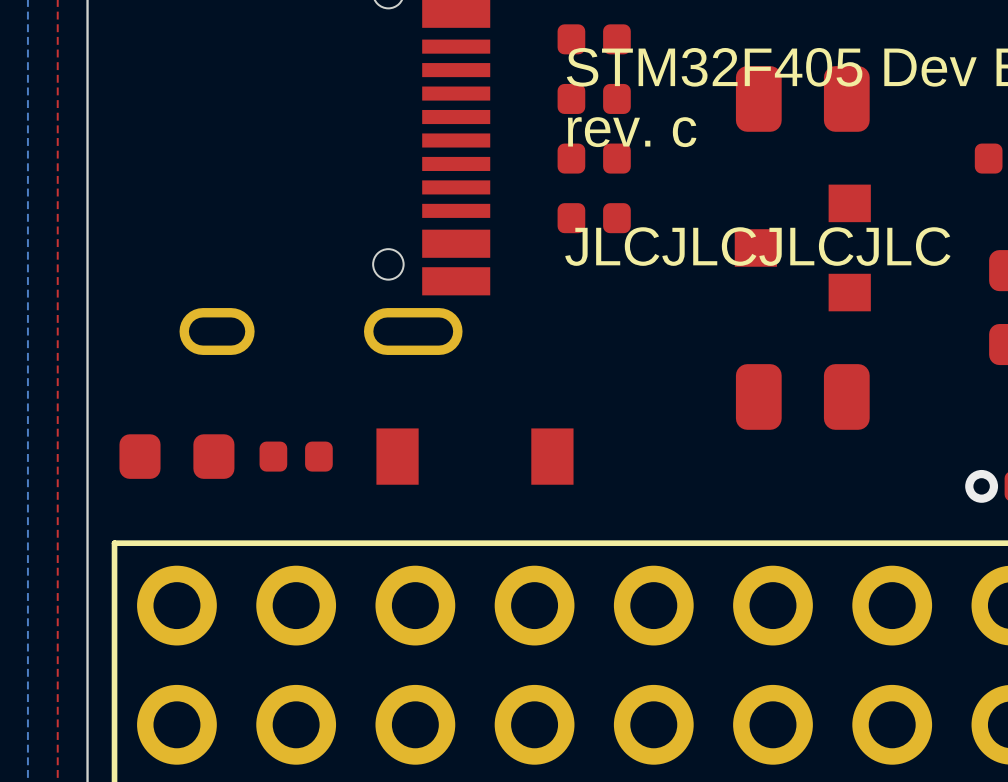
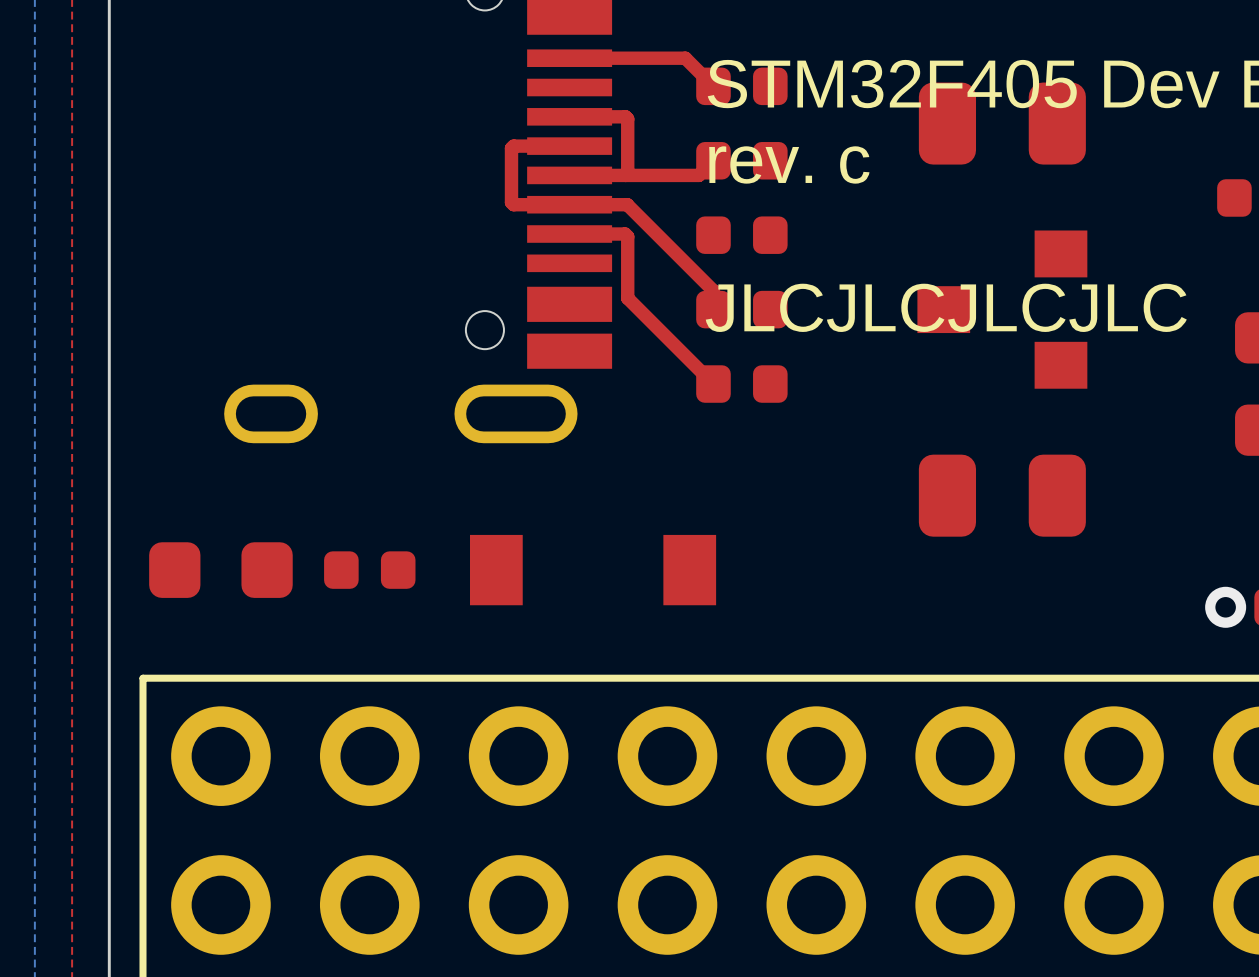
part: (594, 39) -> none
top track: none -> (569, 58) (685, 58) (713, 86)
part: none -> (741, 86)
top track: none -> (569, 116) (625, 116) (627, 119) (627, 173) (625, 175)
part: (594, 98) -> none
top track: none -> (569, 146) (513, 146) (511, 148) (511, 202) (513, 204) (627, 204) (713, 290) (713, 309)
top track: none -> (713, 160) (698, 175) (569, 175)
part: none -> (741, 160)
part: (594, 158) -> none
top track: none -> (569, 234) (625, 234) (627, 236) (627, 298) (713, 384)
part: none -> (741, 235)
part: (594, 218) -> none
part: none -> (741, 309)
part: none -> (741, 384)

